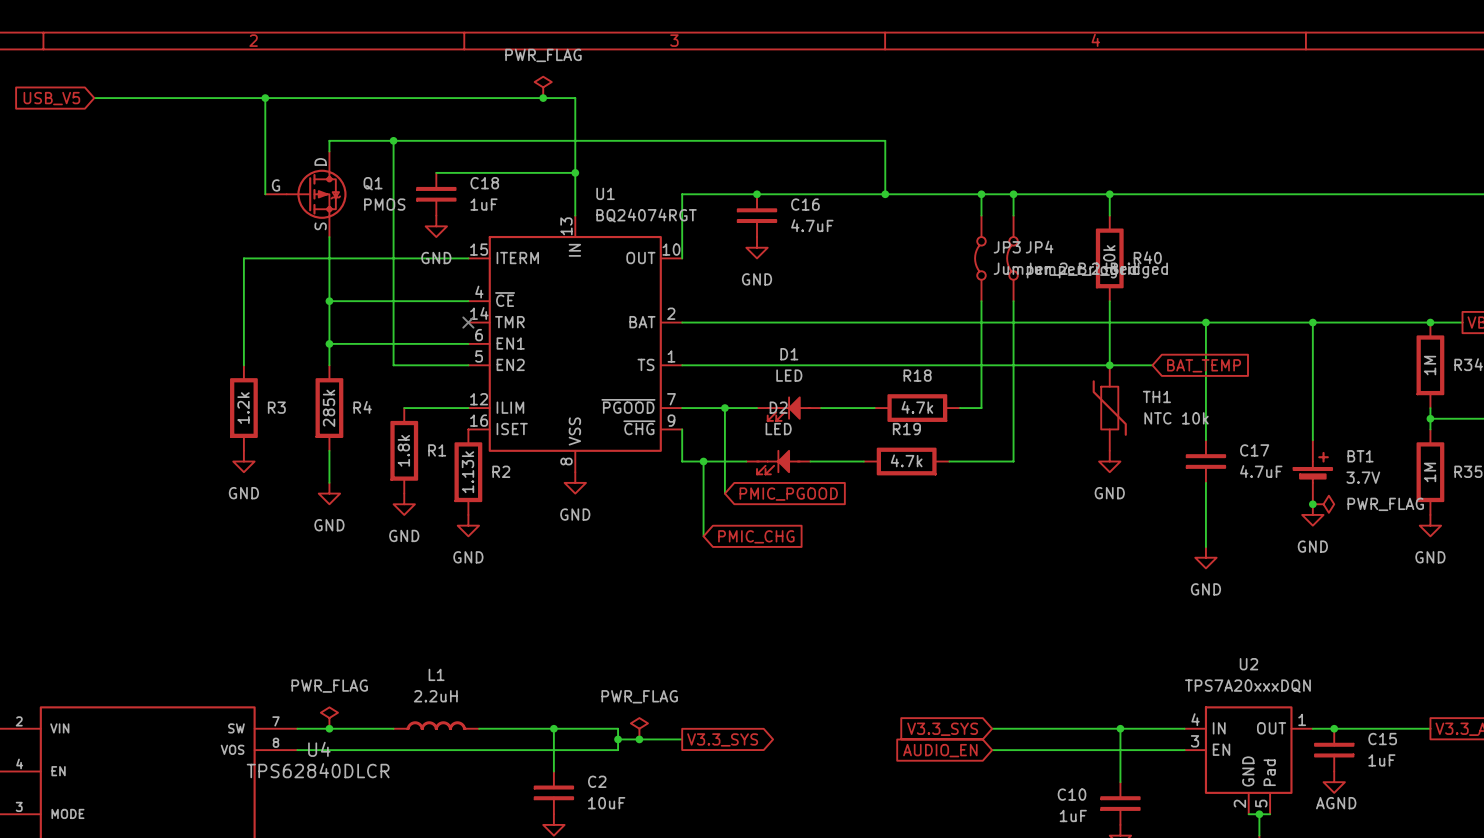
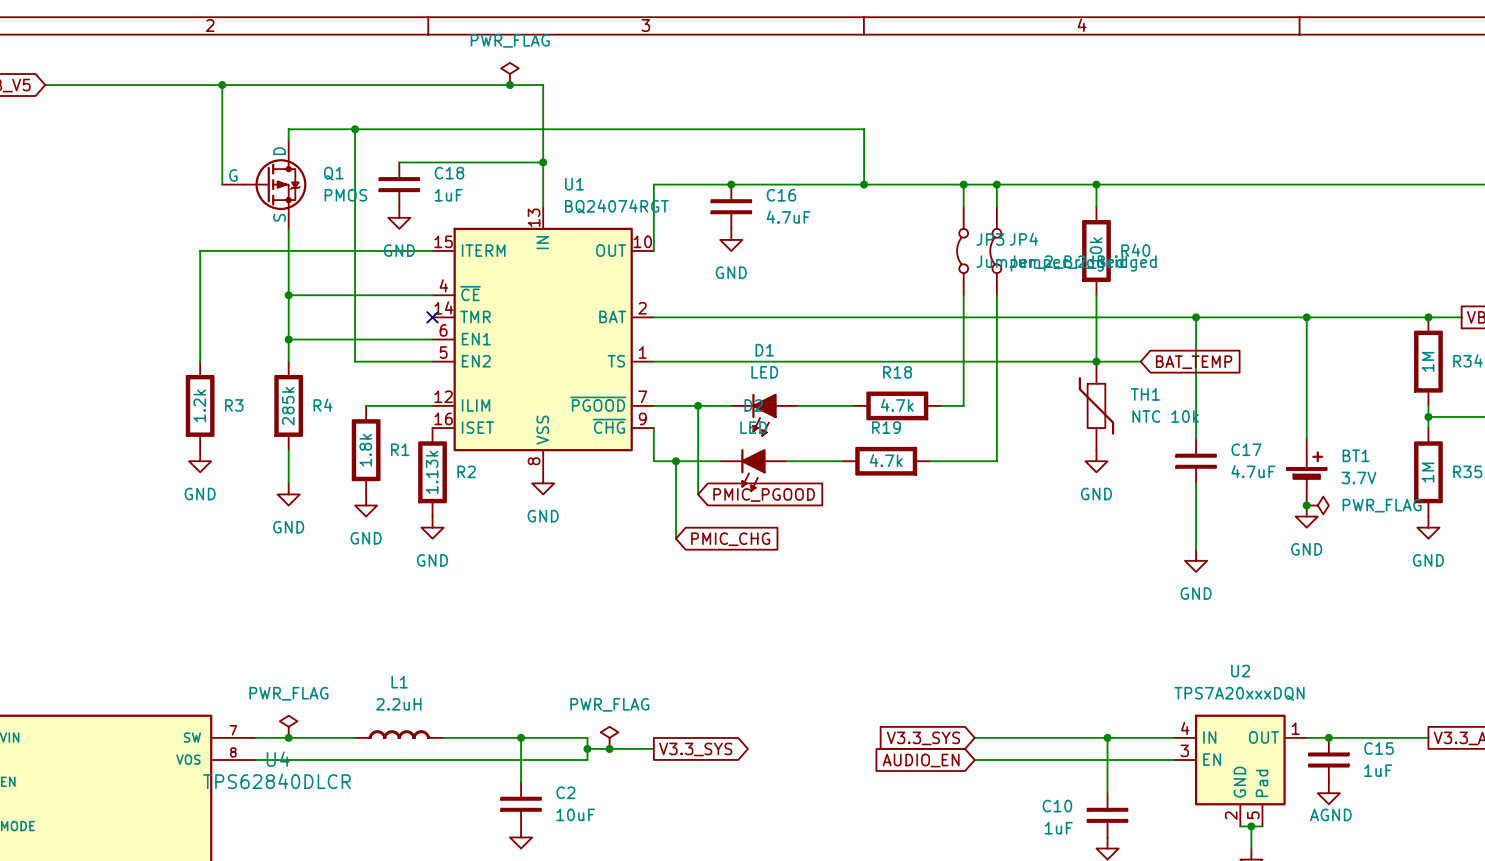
D1 symbol: [757, 397, 822, 421] -> [731, 393, 798, 437]
D2 symbol: [746, 450, 811, 475] -> [720, 449, 787, 492]

